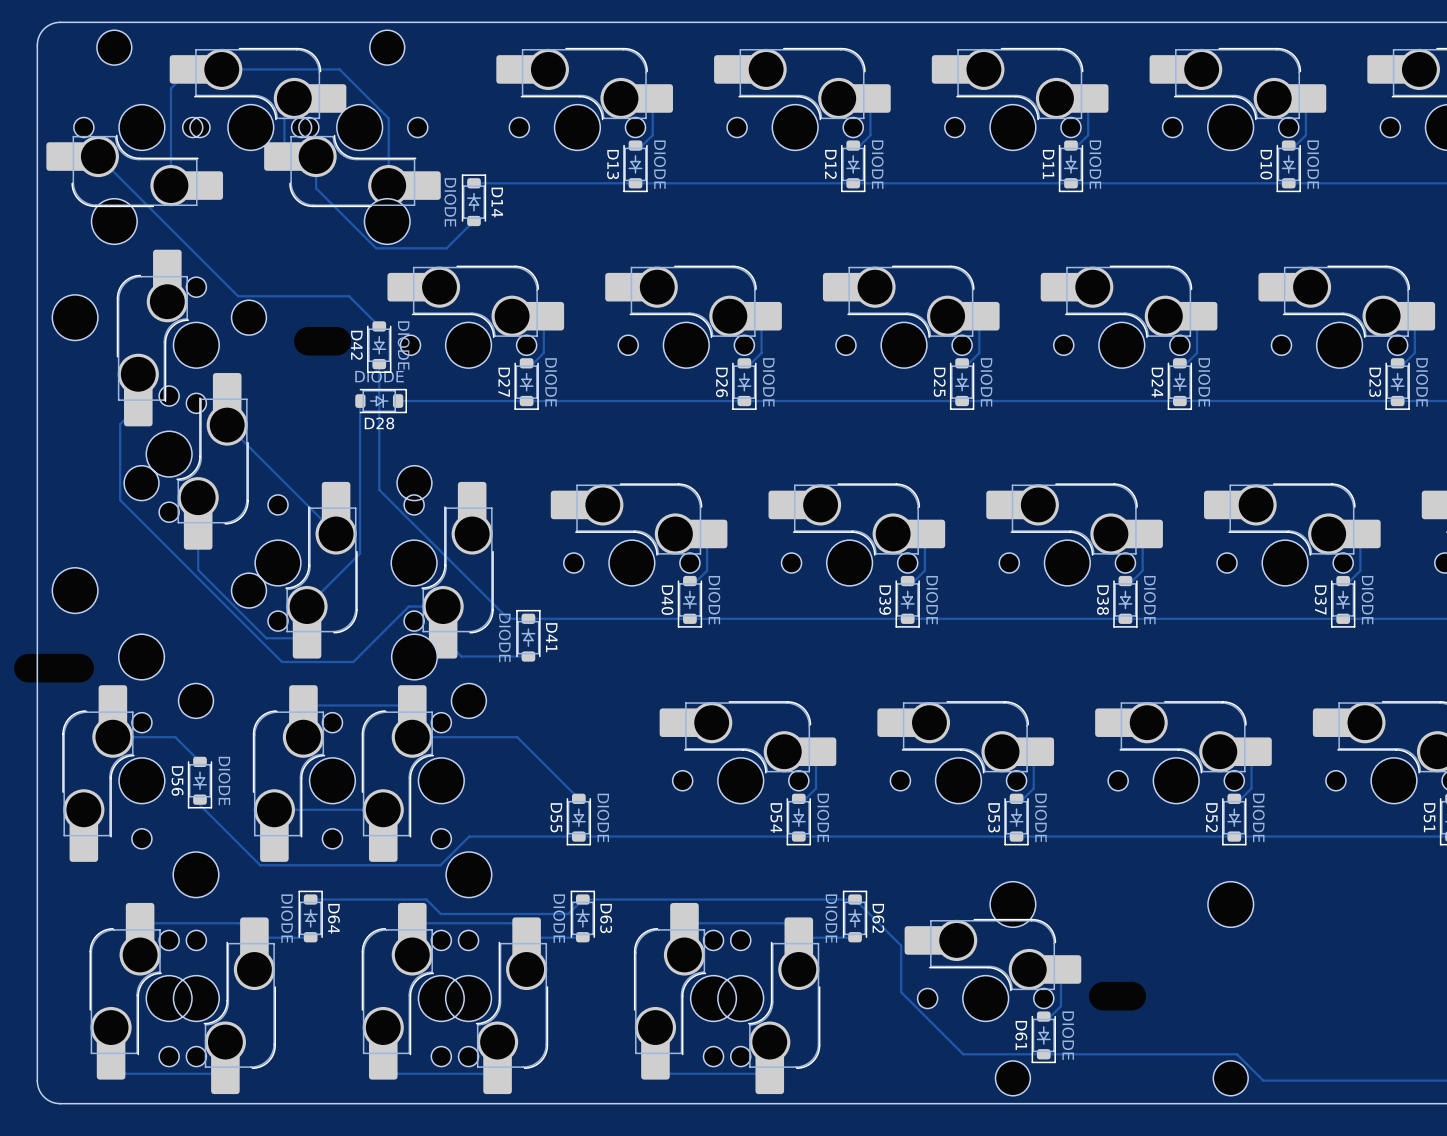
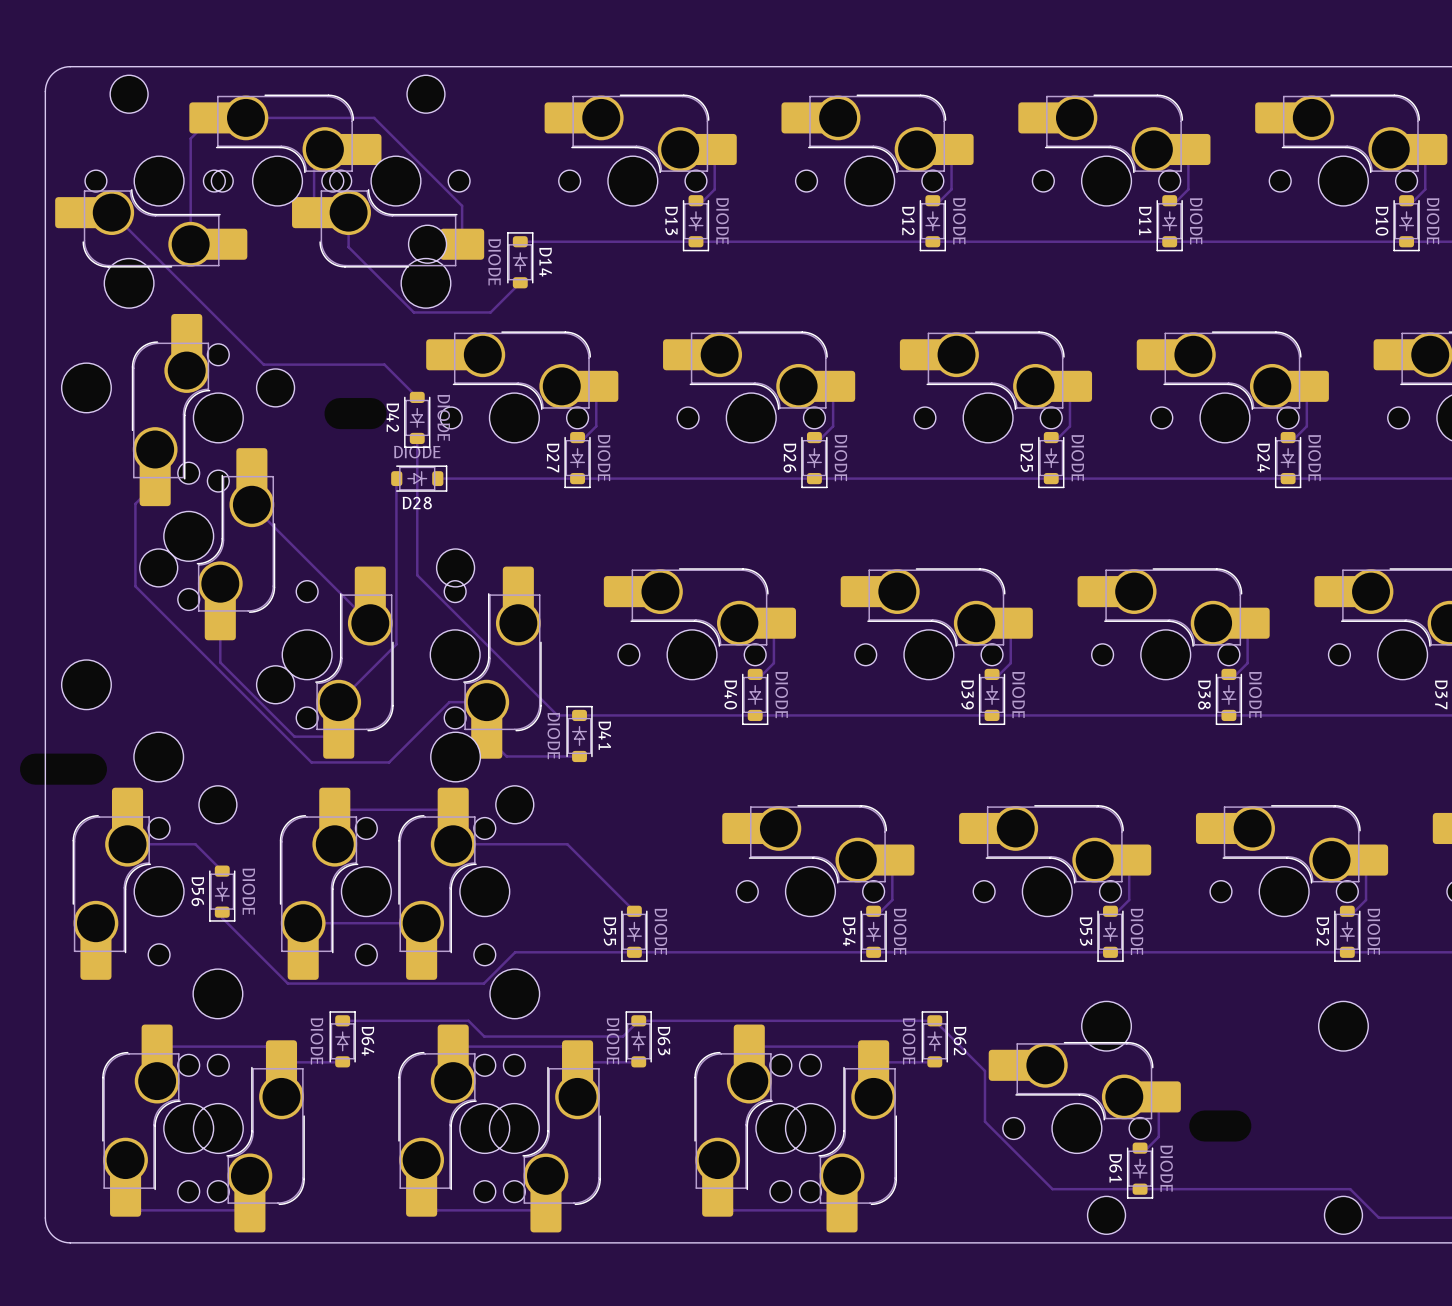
part footprint: [264, 104, 441, 208] -> [292, 156, 485, 268]
track: (388, 118) (388, 185) -> (427, 171) (462, 205) (462, 244)

